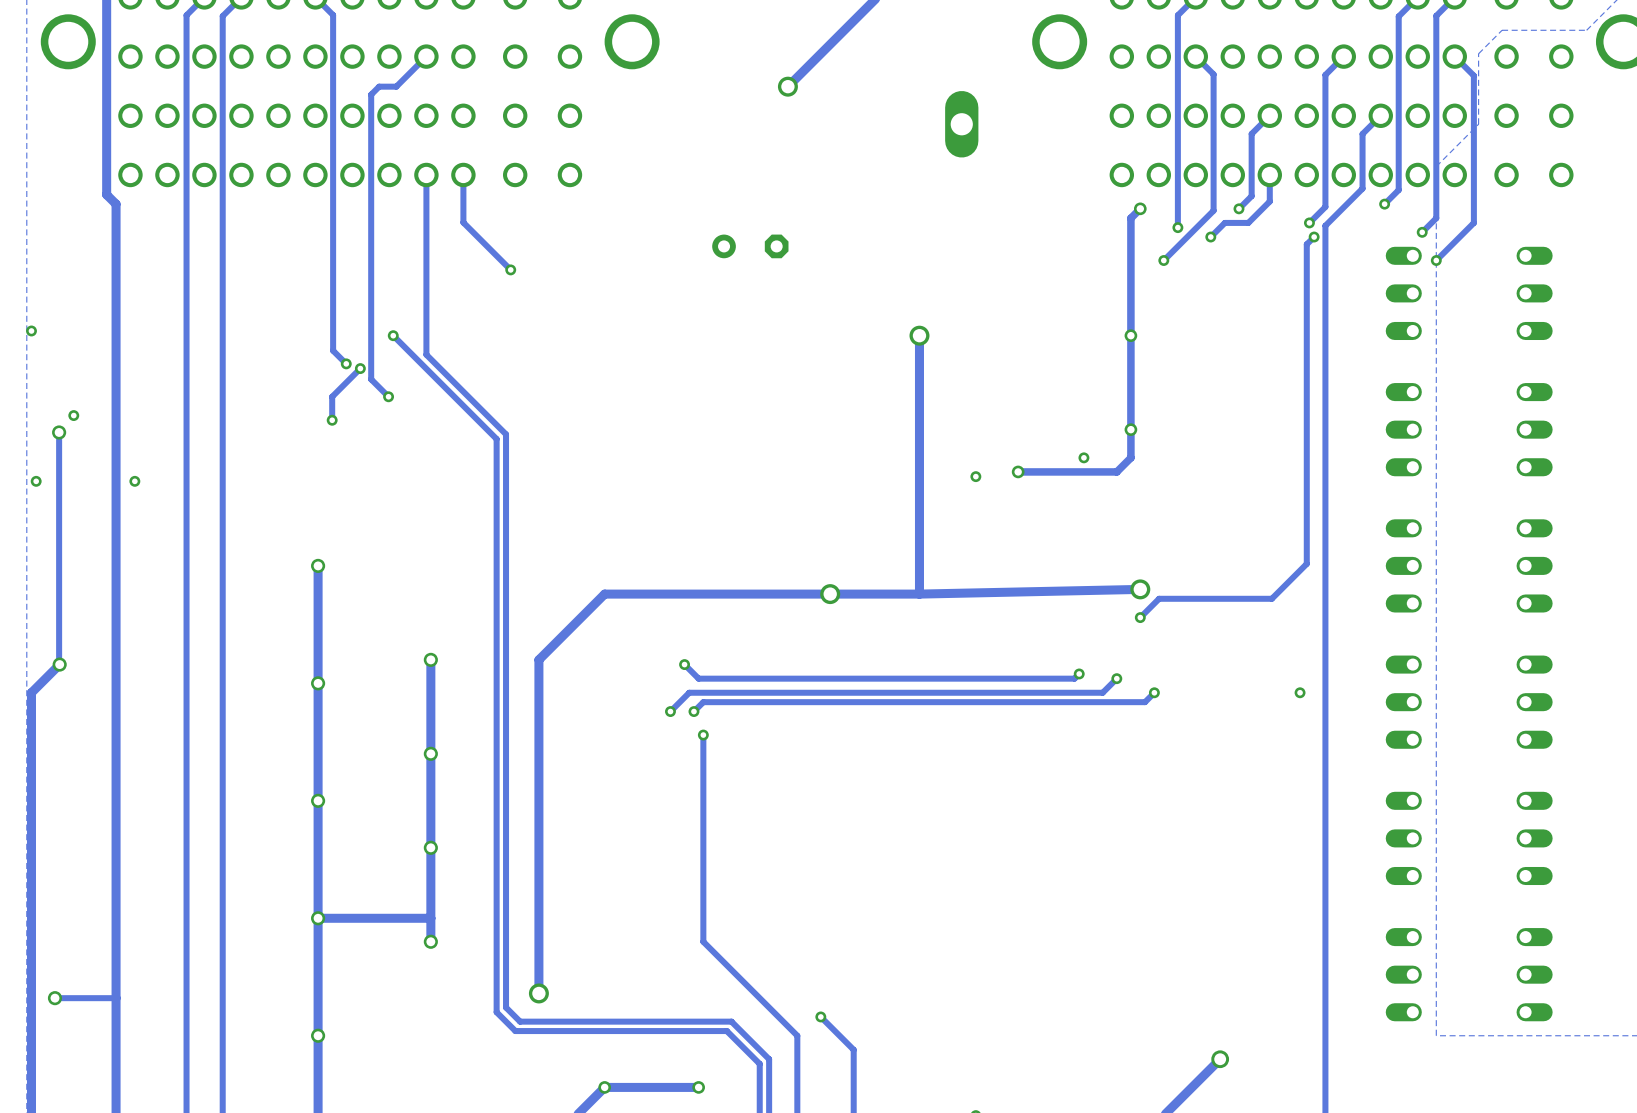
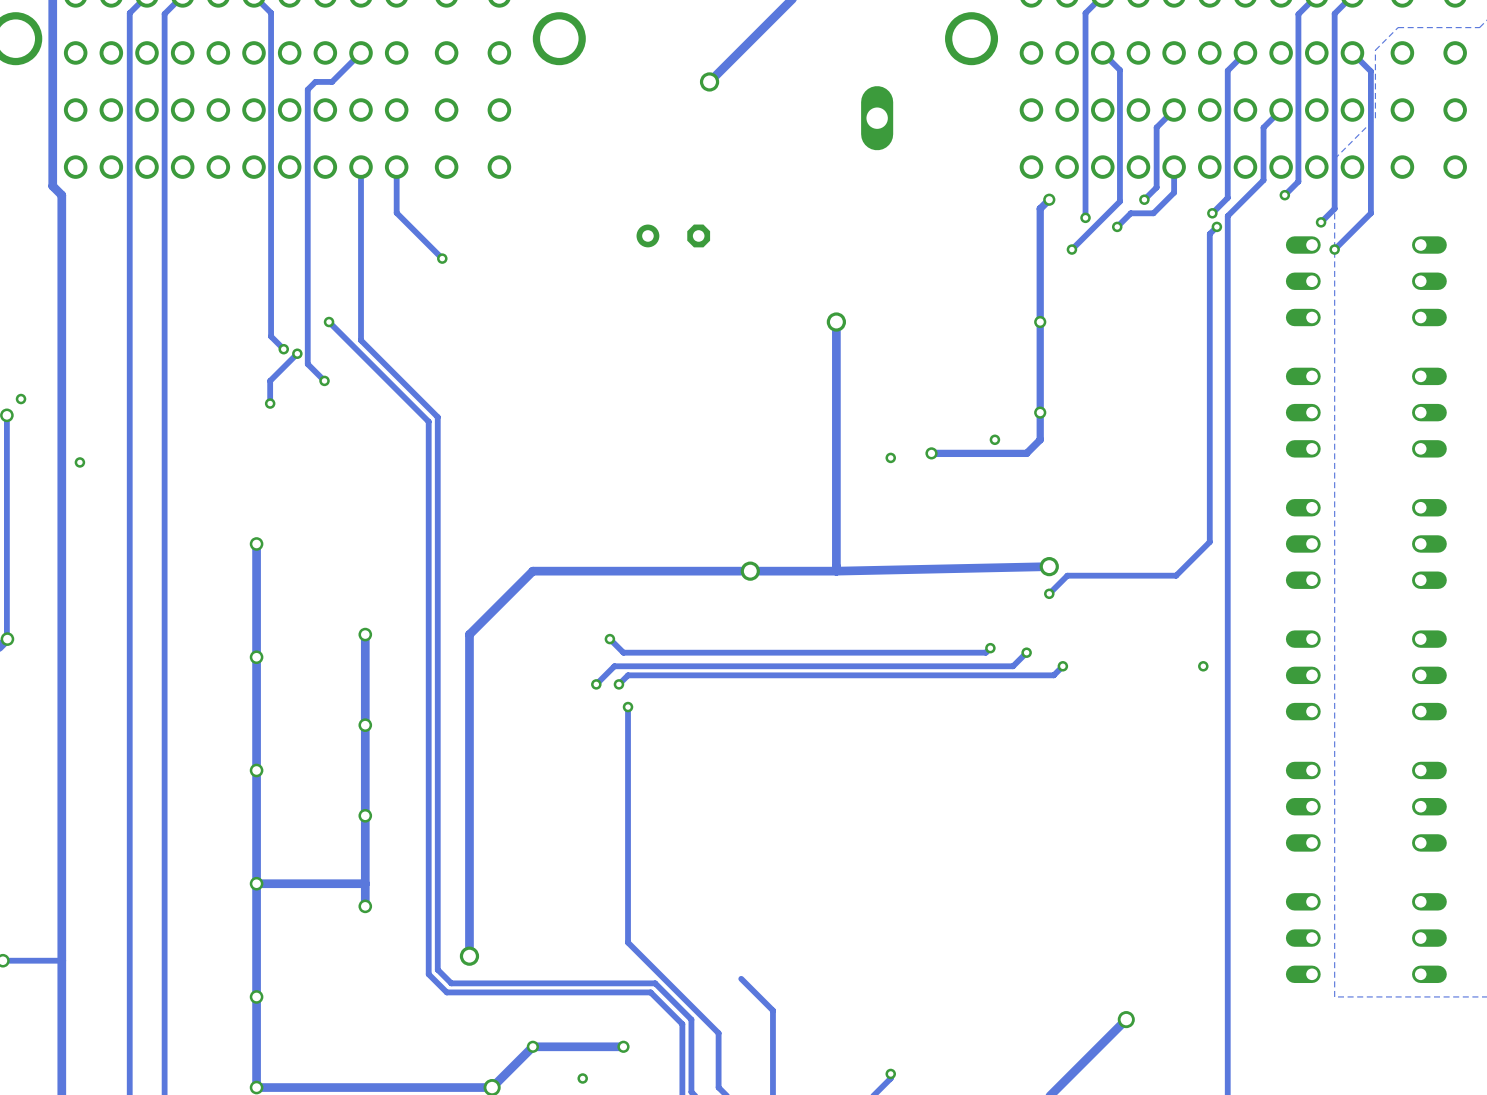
track: (703, 941) (797, 1035) (797, 1073) -> (628, 906) (628, 942) (718, 1033)
via: (820, 1016) -> none

